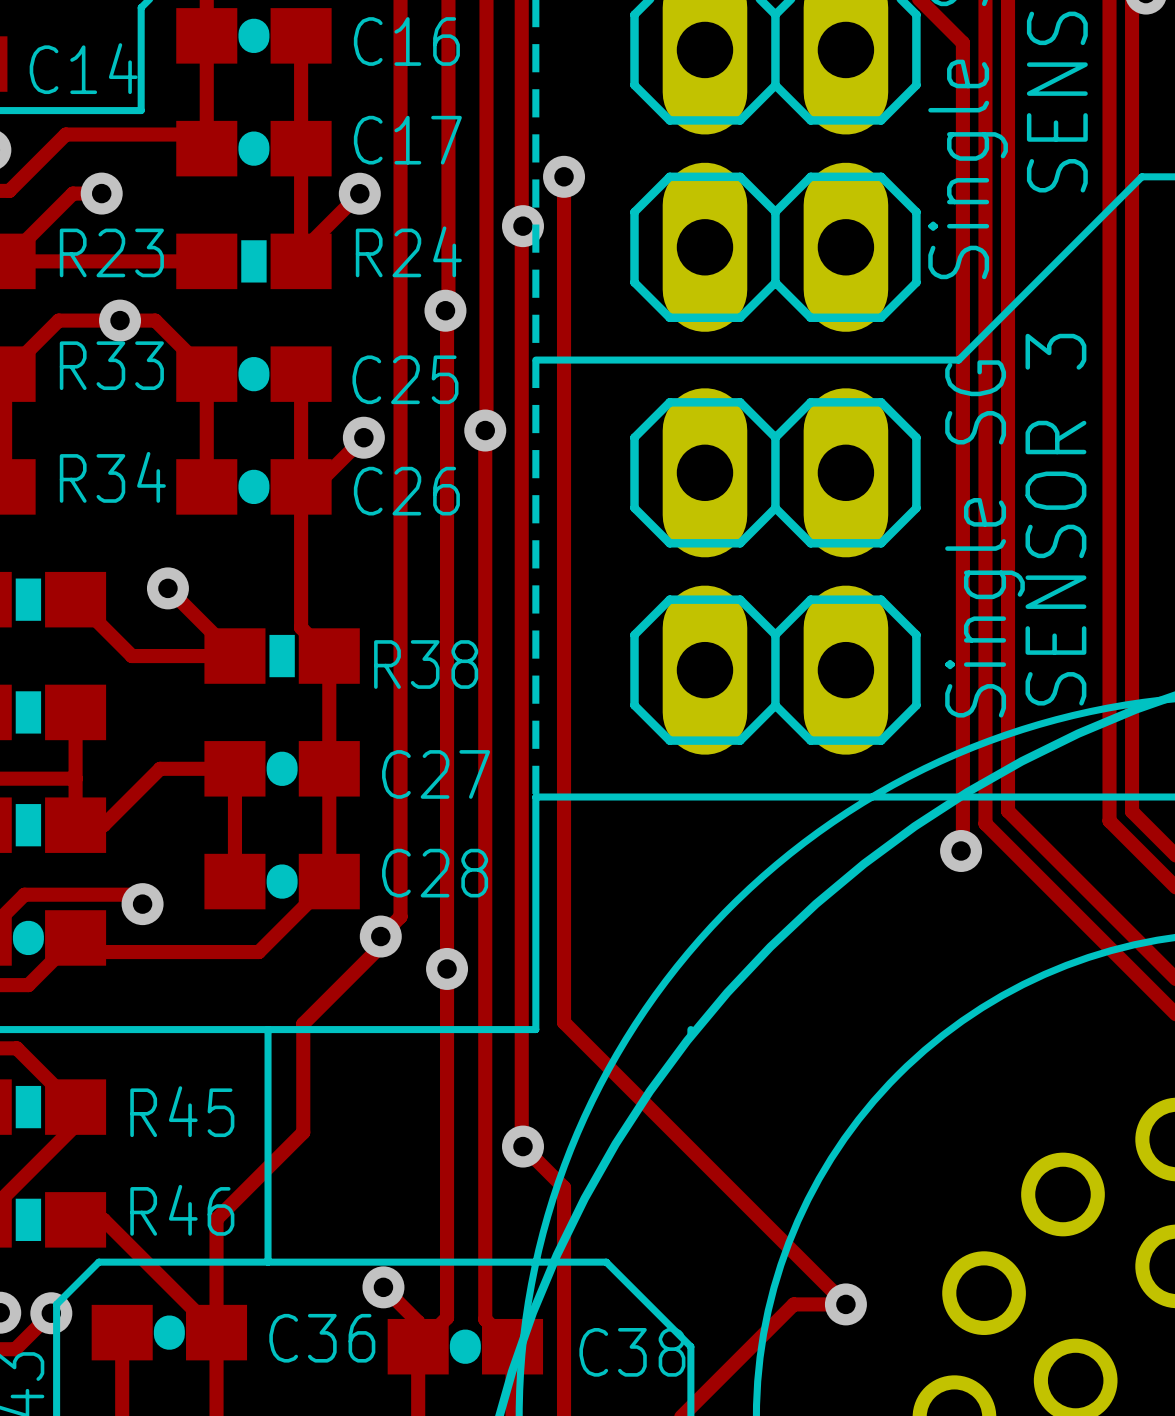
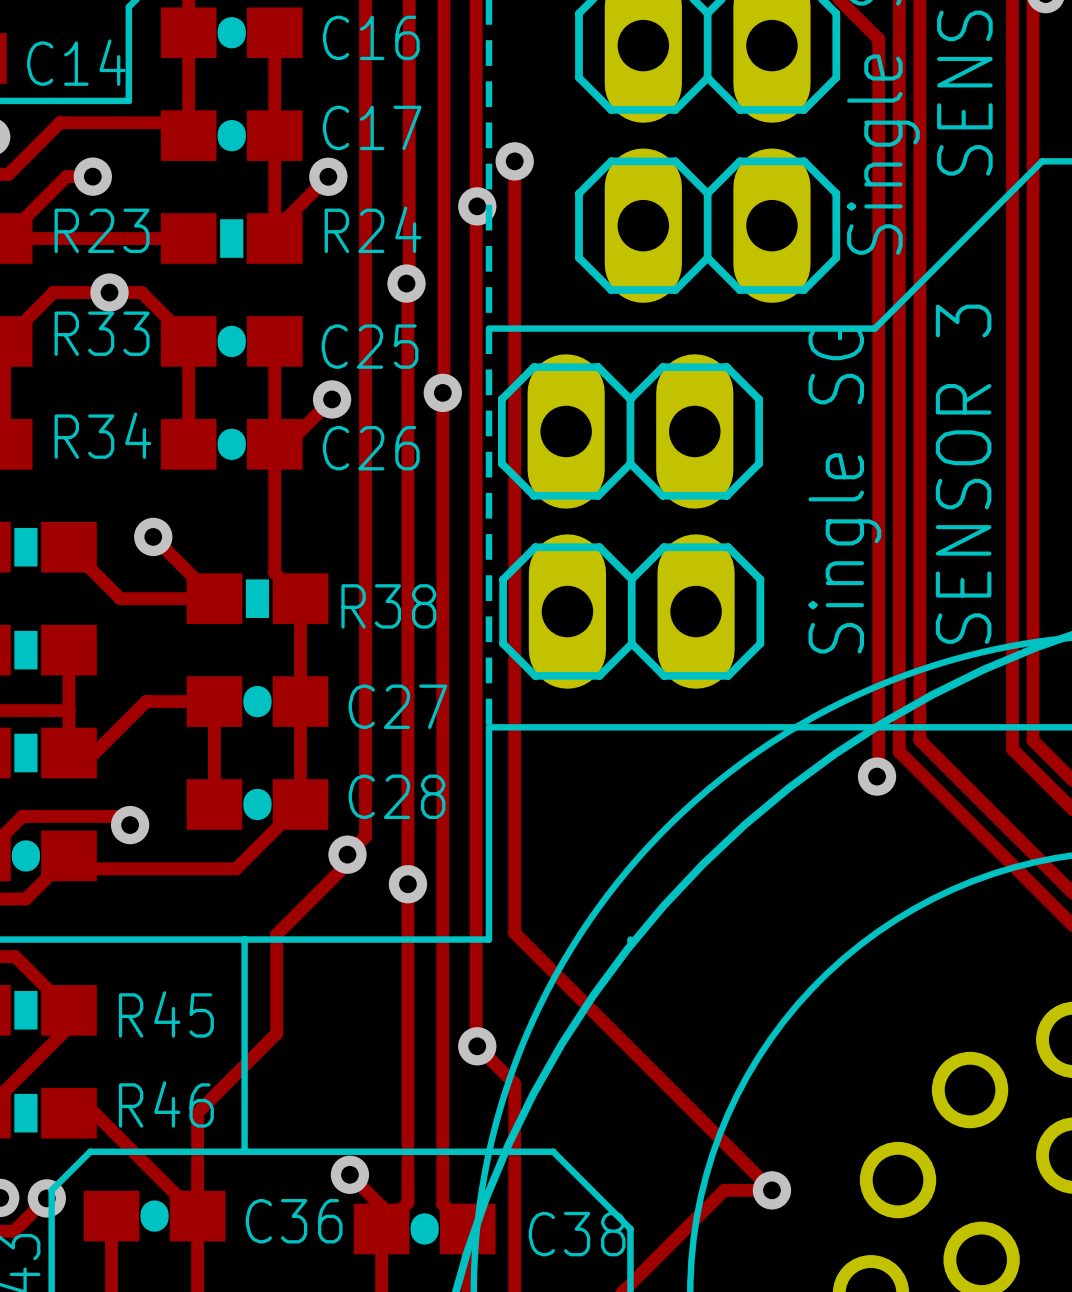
part position: (775, 472) -> (630, 431)
text position: Single SG (985, 538) -> Single SG (844, 490)
part position: (775, 670) -> (631, 611)

